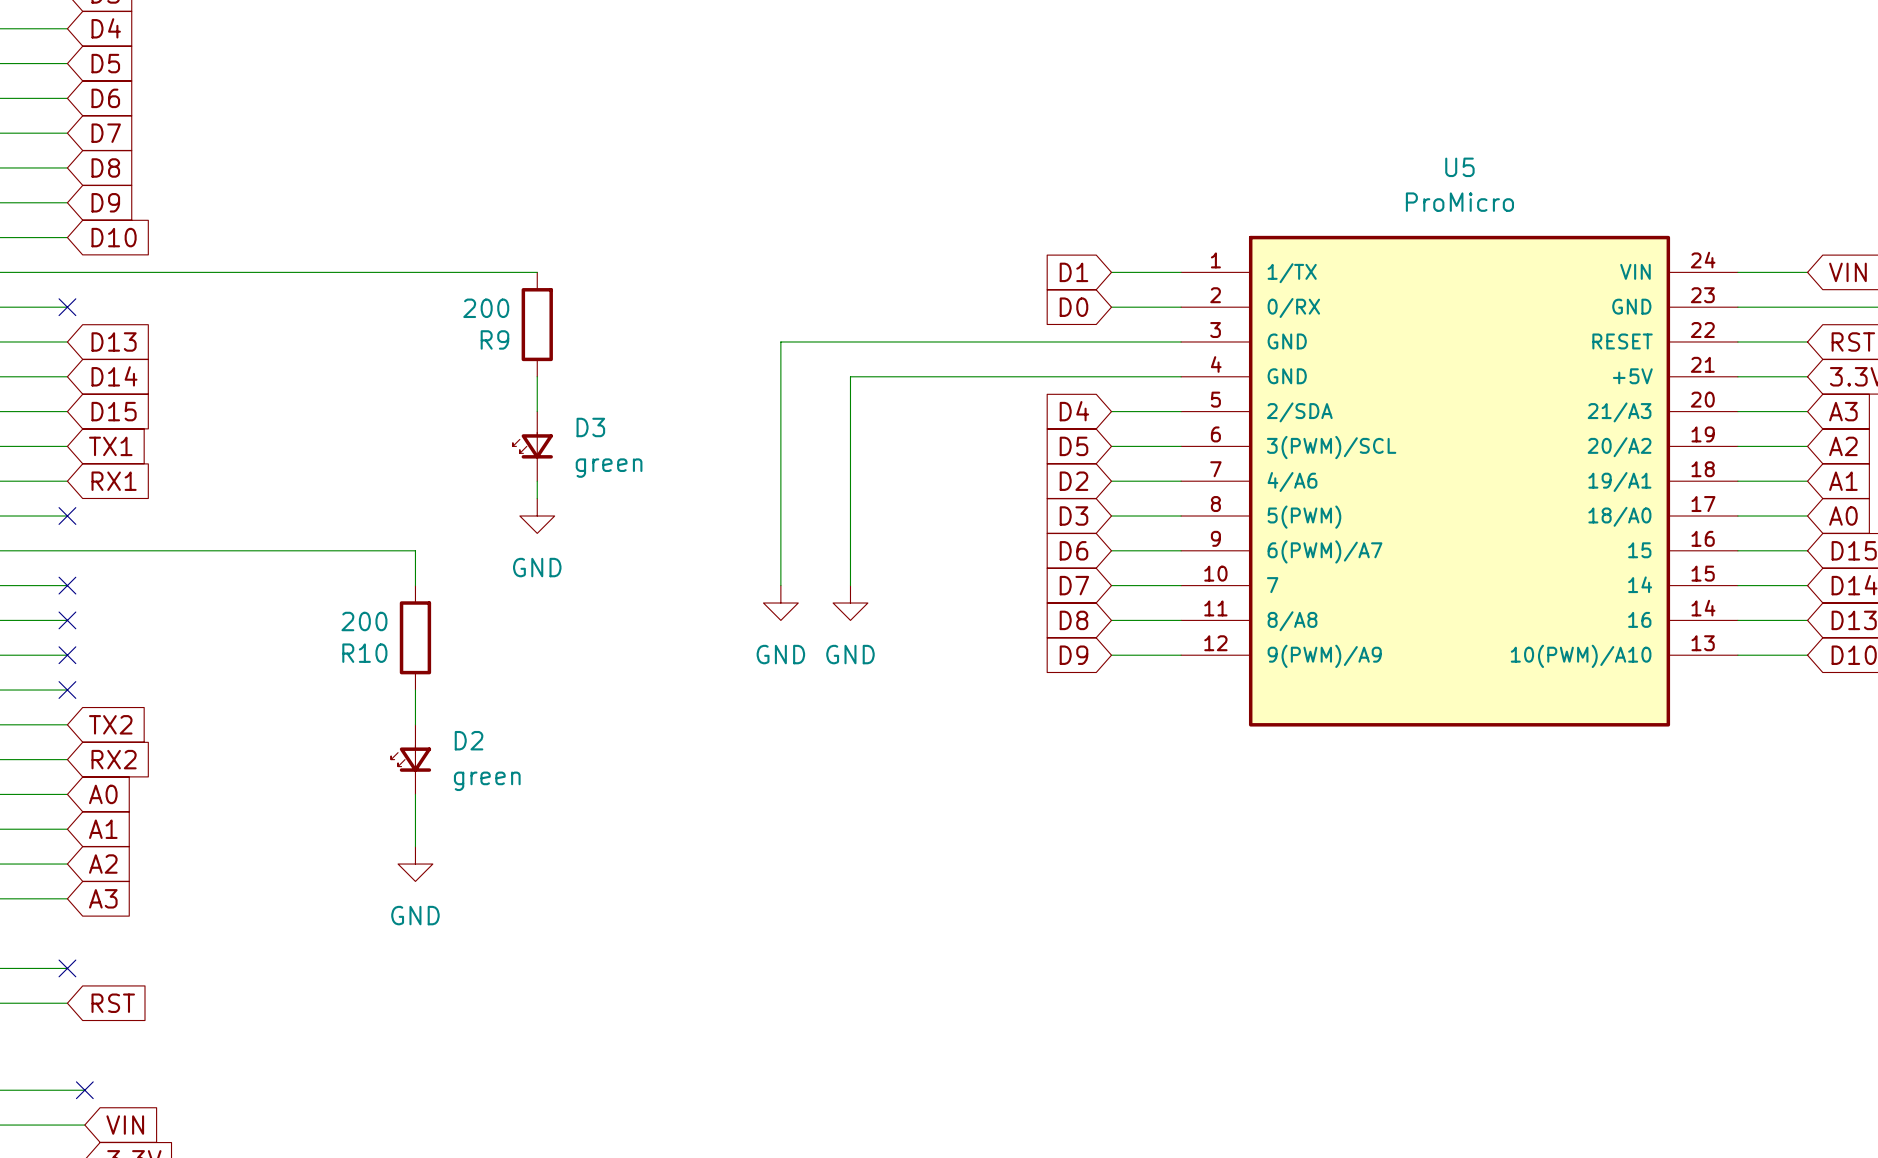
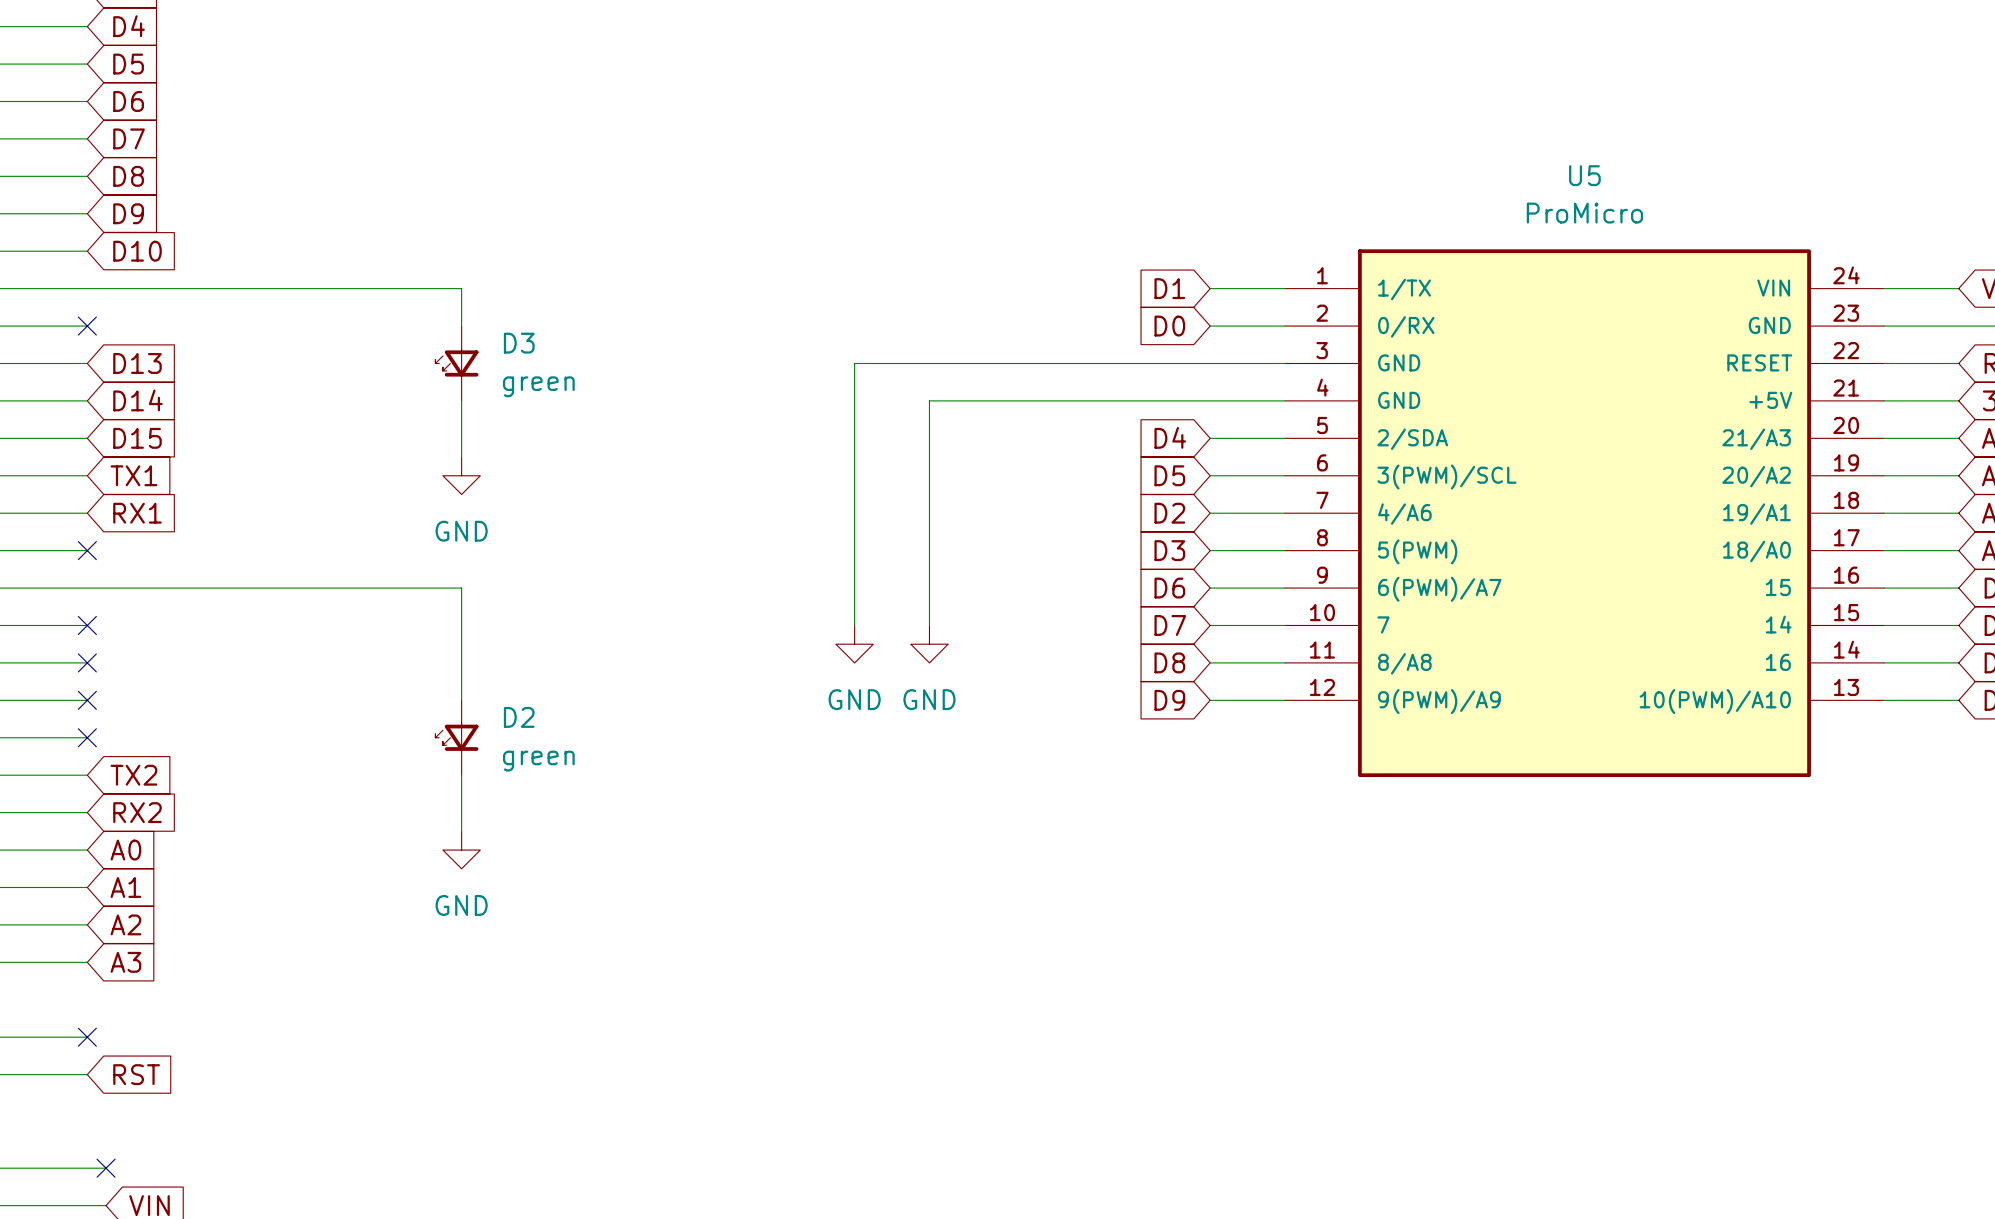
wire: (415, 272) (537, 272) -> (461, 288) (461, 326)
R9: 200 (537, 324) -> none
wire: none -> (461, 400) (461, 457)
wire: (537, 376) (537, 411) -> none
D3 position: (532, 446) -> (456, 363)
wire: (537, 481) (537, 498) -> none
power symbol position: GND (537, 516) -> GND (461, 475)
wire: none -> (461, 625) (461, 700)
R10: 200 (415, 637) -> none
D2 position: (411, 759) -> (456, 737)
wire: (415, 794) (415, 846) -> none
power symbol position: GND (415, 864) -> GND (461, 850)

